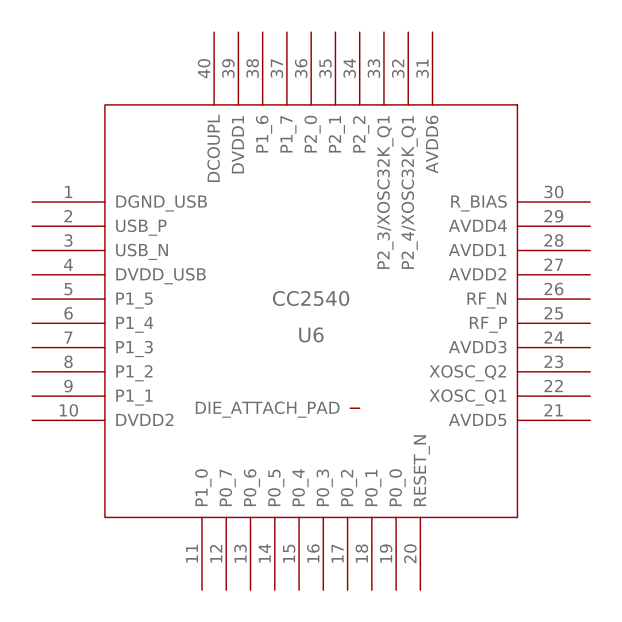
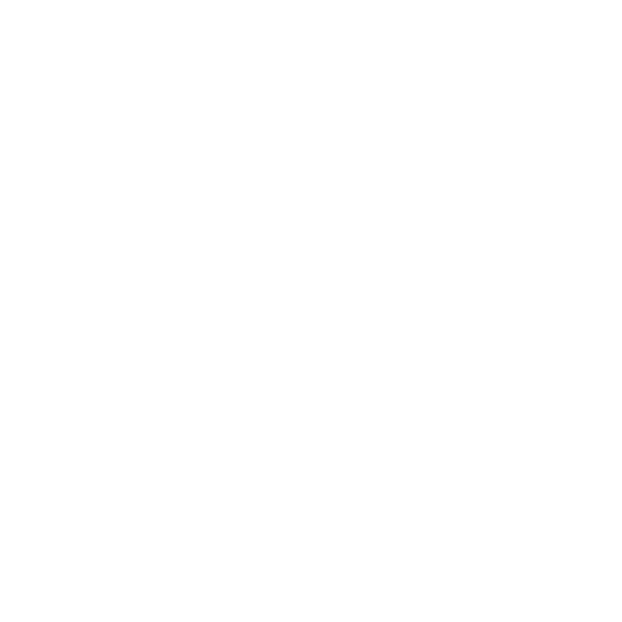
U6: CC2540 (311, 311) -> none

